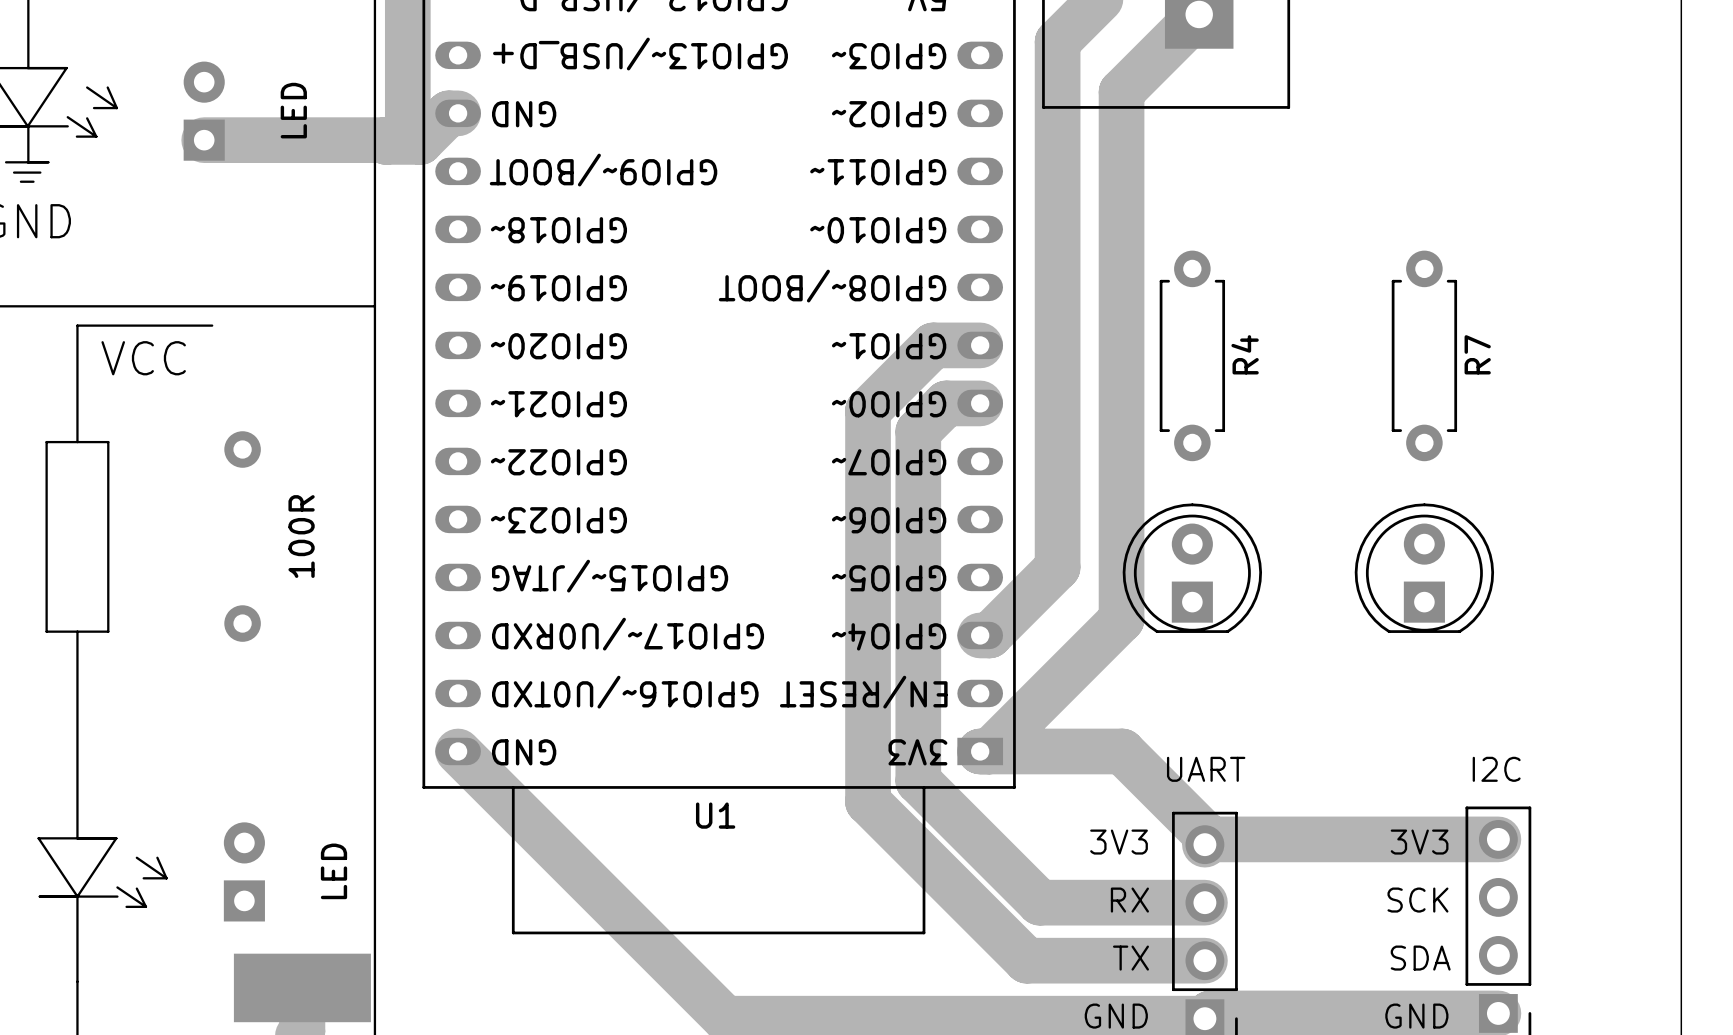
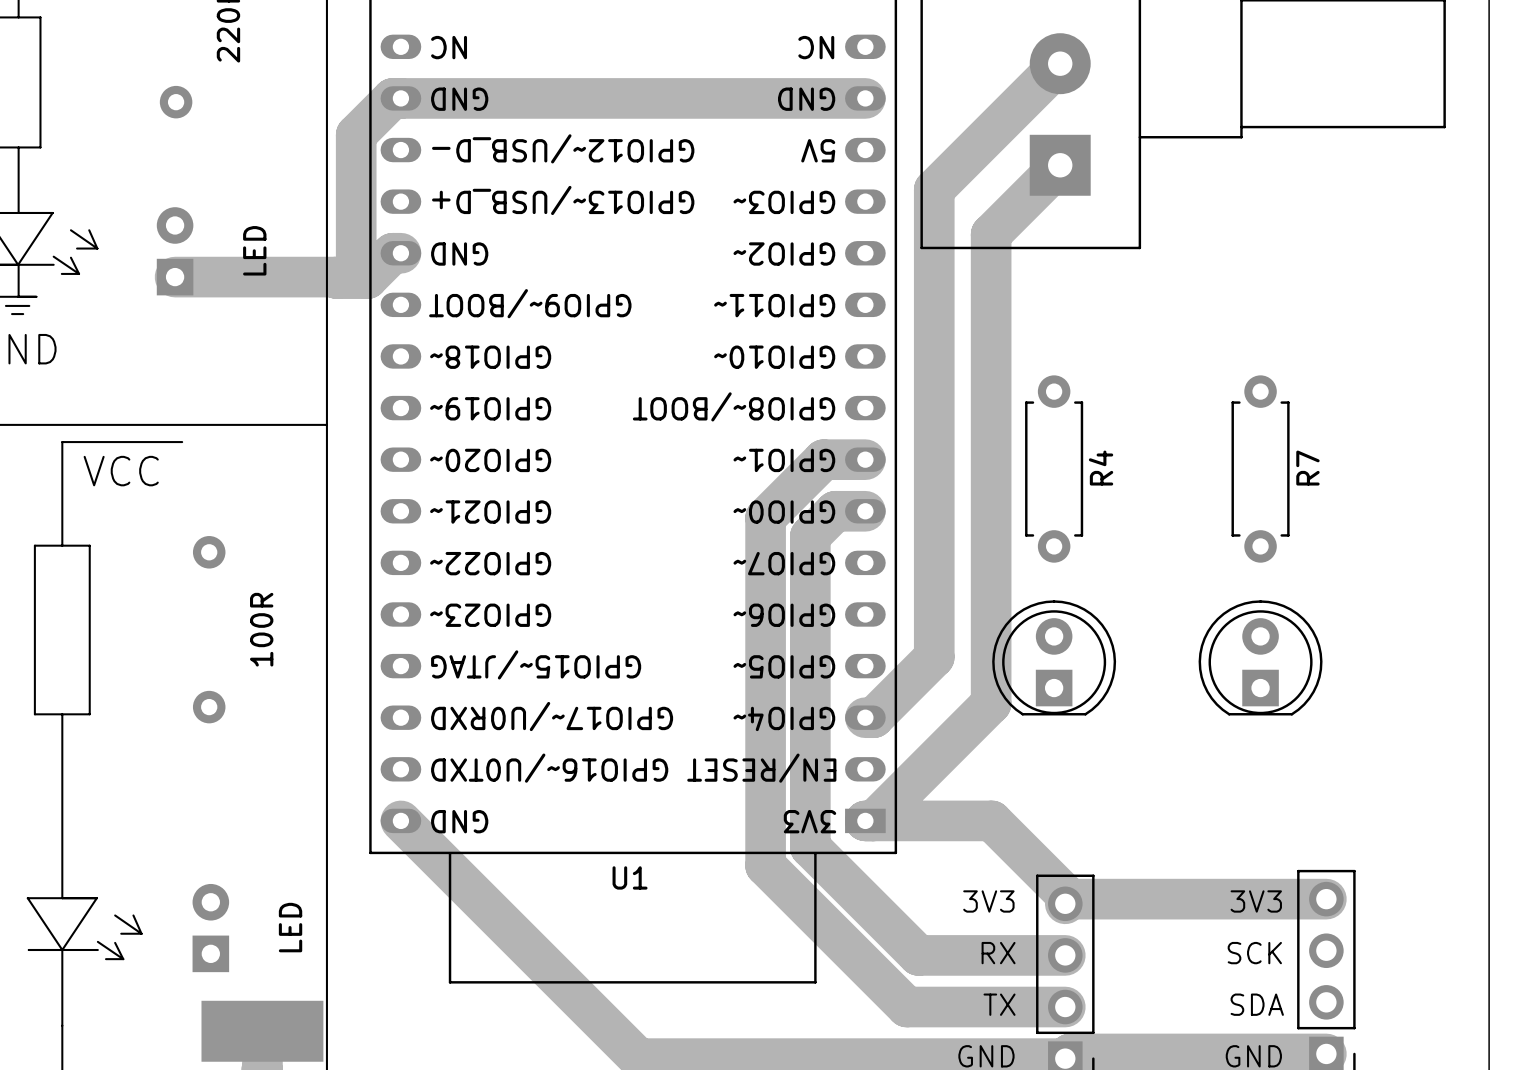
text: UART (1206, 769) -> none
text: I2C (1496, 769) -> none

